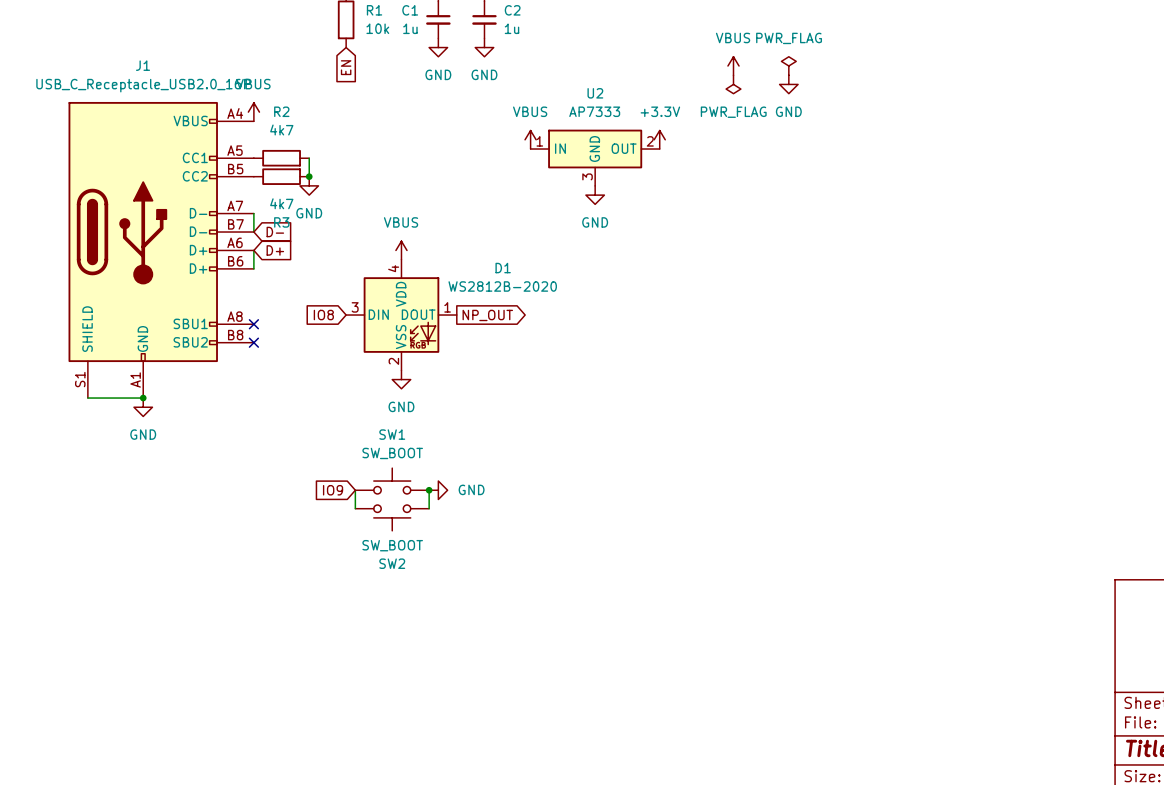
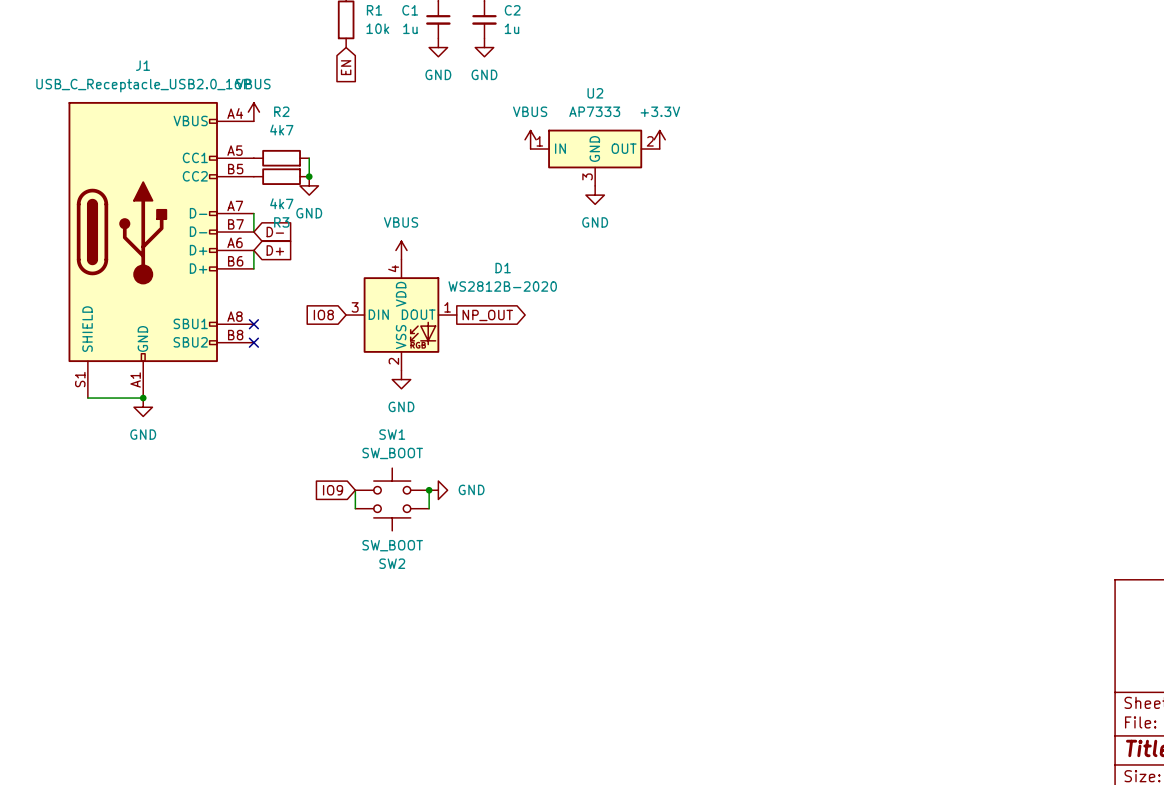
power symbol: VBUS (733, 65) -> none
power symbol: PWR_FLAG (788, 65) -> none
power symbol: PWR_FLAG (733, 84) -> none
power symbol: GND (788, 84) -> none

